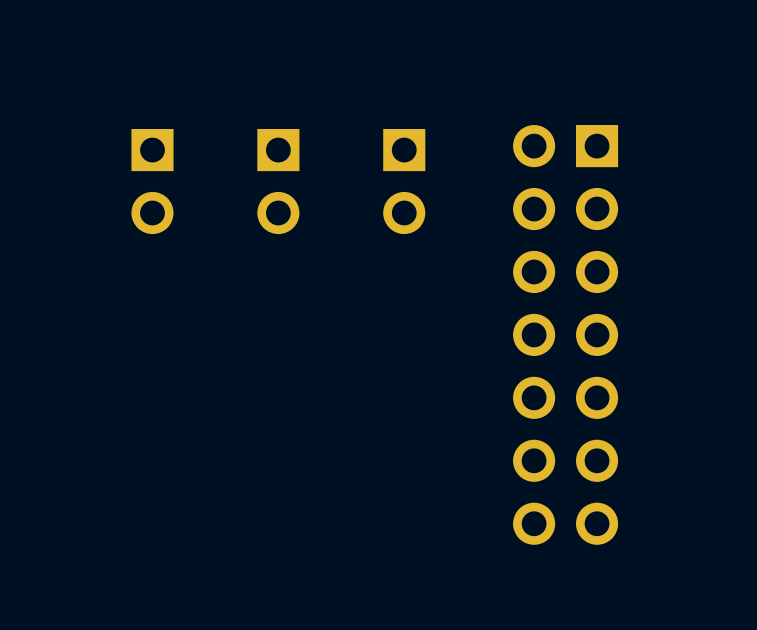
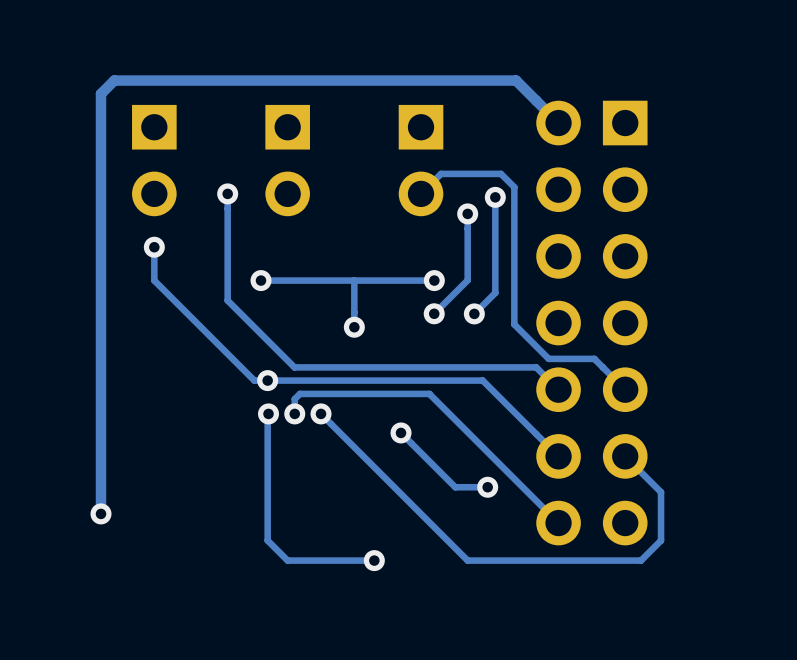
track: none -> (558, 123) (516, 80) (114, 80) (101, 93) (101, 513)
track: none -> (227, 193) (227, 300) (294, 367) (536, 367) (558, 389)
via: none -> (227, 193)
track: none -> (421, 193) (441, 173) (501, 173) (514, 187) (514, 324) (548, 358) (594, 358) (625, 389)
track: none -> (495, 197) (495, 292) (474, 313)
via: none -> (495, 197)
track: none -> (467, 213) (467, 280) (434, 313)
via: none -> (467, 213)
track: none -> (154, 247) (154, 280) (254, 380) (482, 380) (558, 456)
via: none -> (154, 247)
via: none -> (261, 280)
track: none -> (354, 280) (354, 327)
track: none -> (434, 280) (261, 280)
via: none -> (434, 280)
via: none -> (434, 313)
via: none -> (474, 313)
via: none -> (354, 327)
via: none -> (267, 380)
track: none -> (267, 413) (267, 540) (287, 560) (374, 560)
via: none -> (268, 413)
track: none -> (294, 413) (294, 399) (299, 393) (429, 393) (558, 523)
via: none -> (294, 413)
track: none -> (321, 413) (467, 560) (641, 560) (661, 540) (661, 492) (625, 456)
via: none -> (321, 413)
track: none -> (401, 432) (455, 487) (487, 487)
via: none -> (401, 432)
via: none -> (487, 487)
via: none -> (101, 513)
via: none -> (374, 560)

